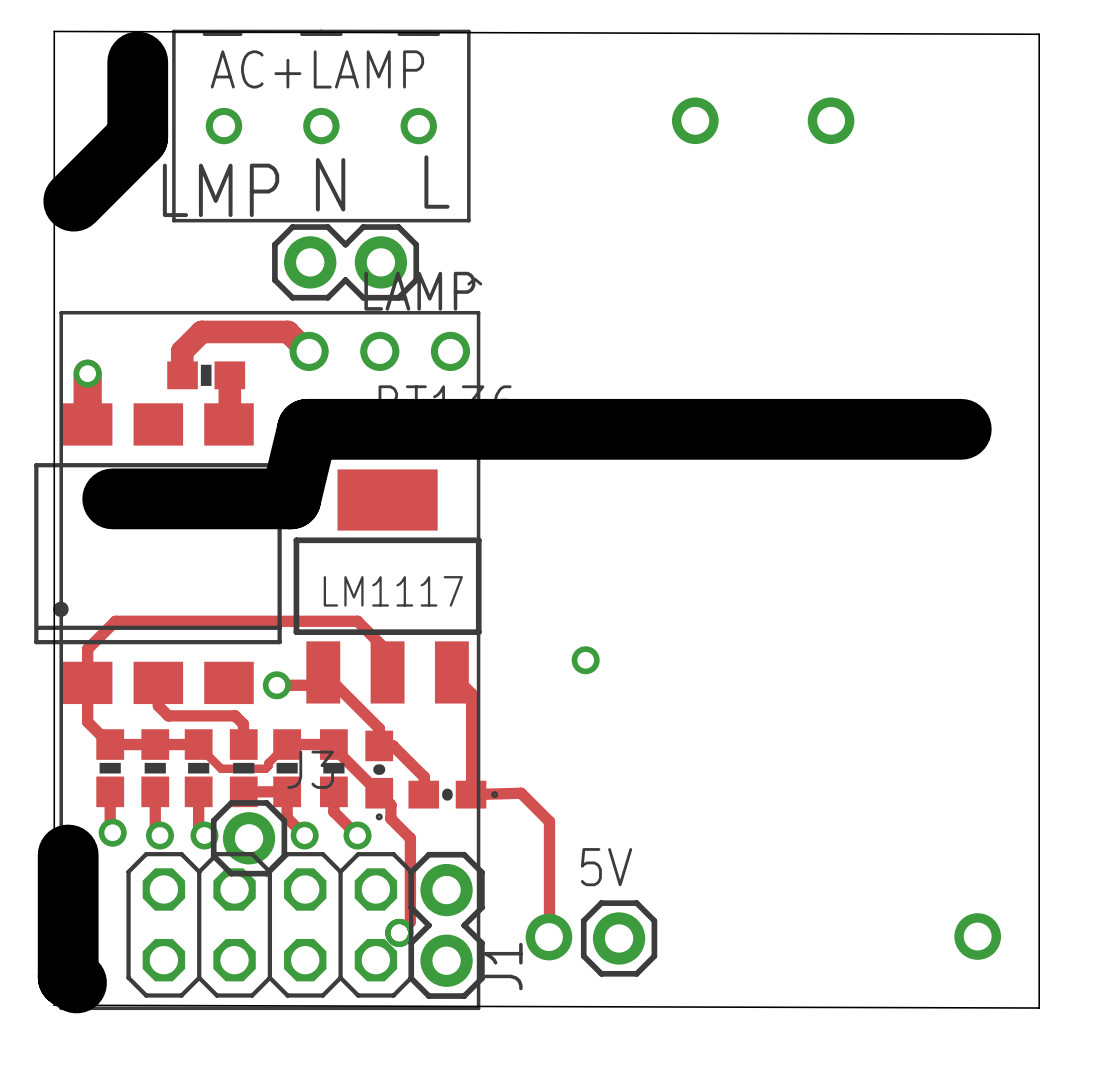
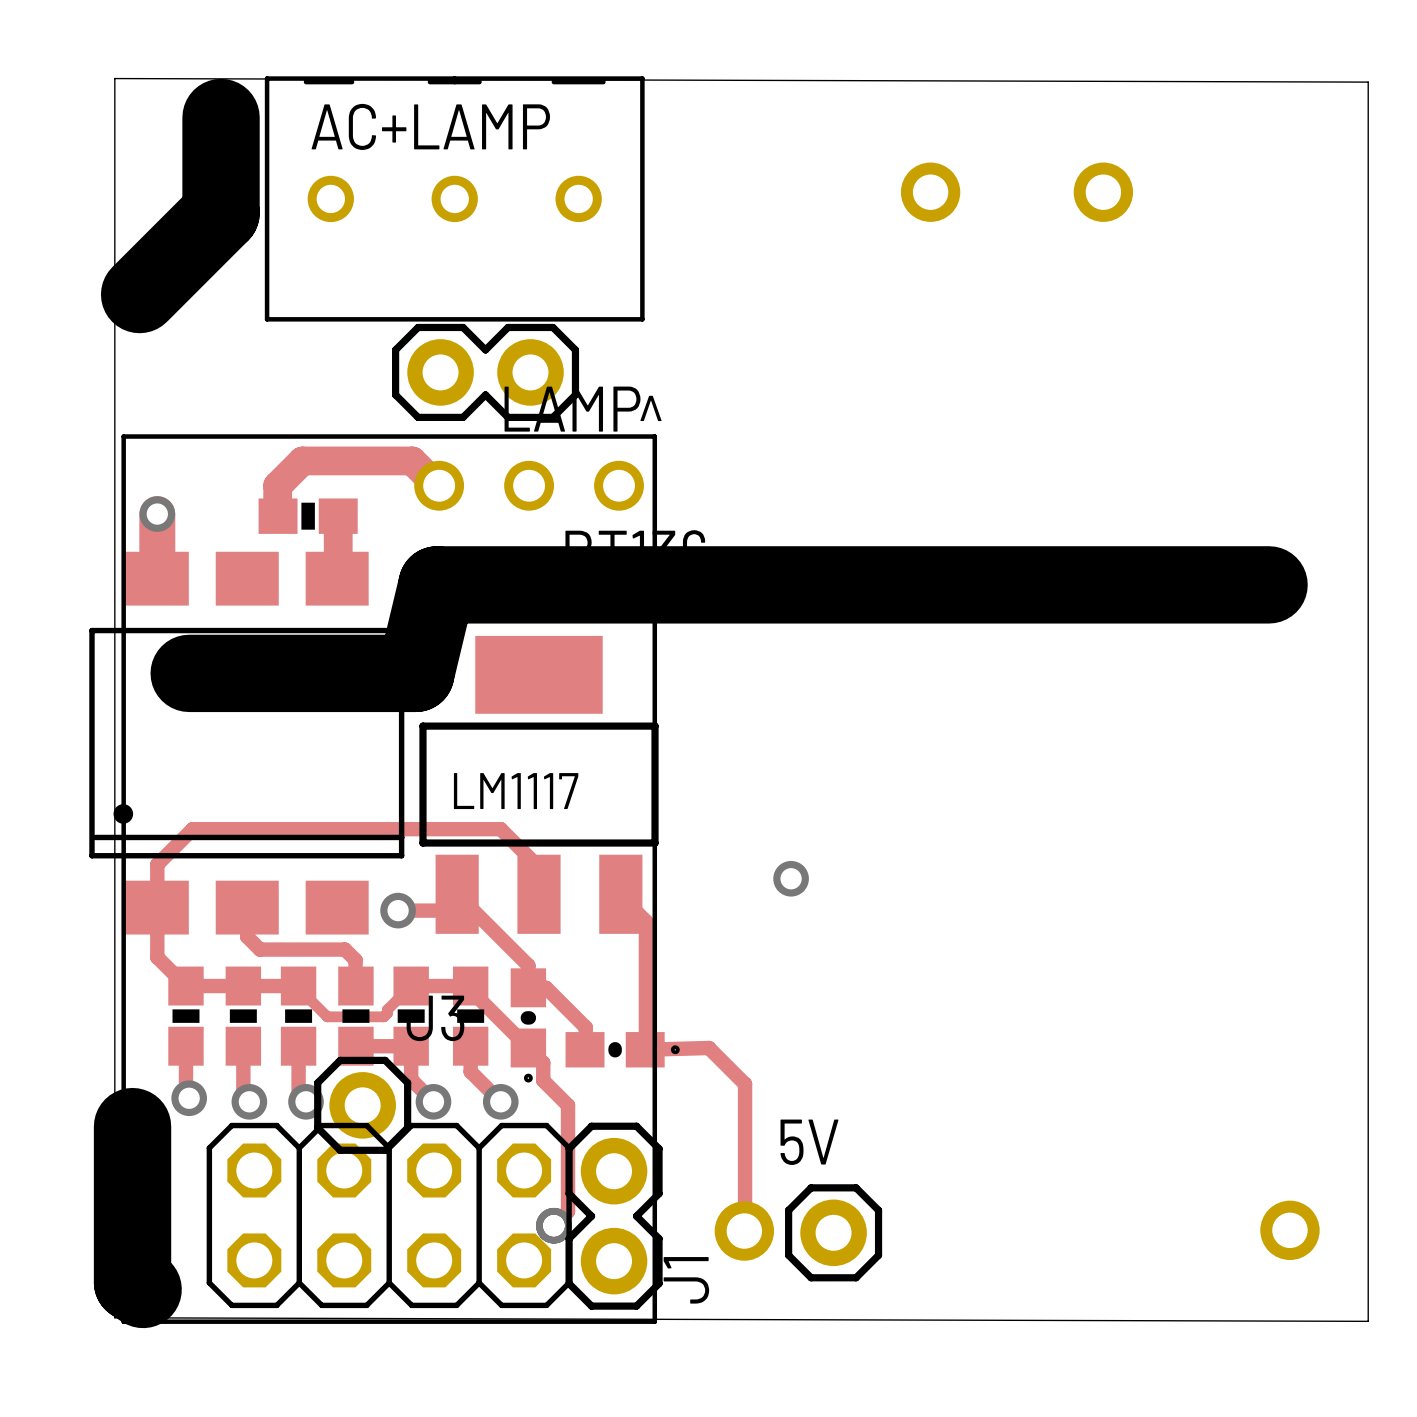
text: L (436, 182) -> none
text: N (330, 184) -> none
text: LMP (221, 190) -> none

